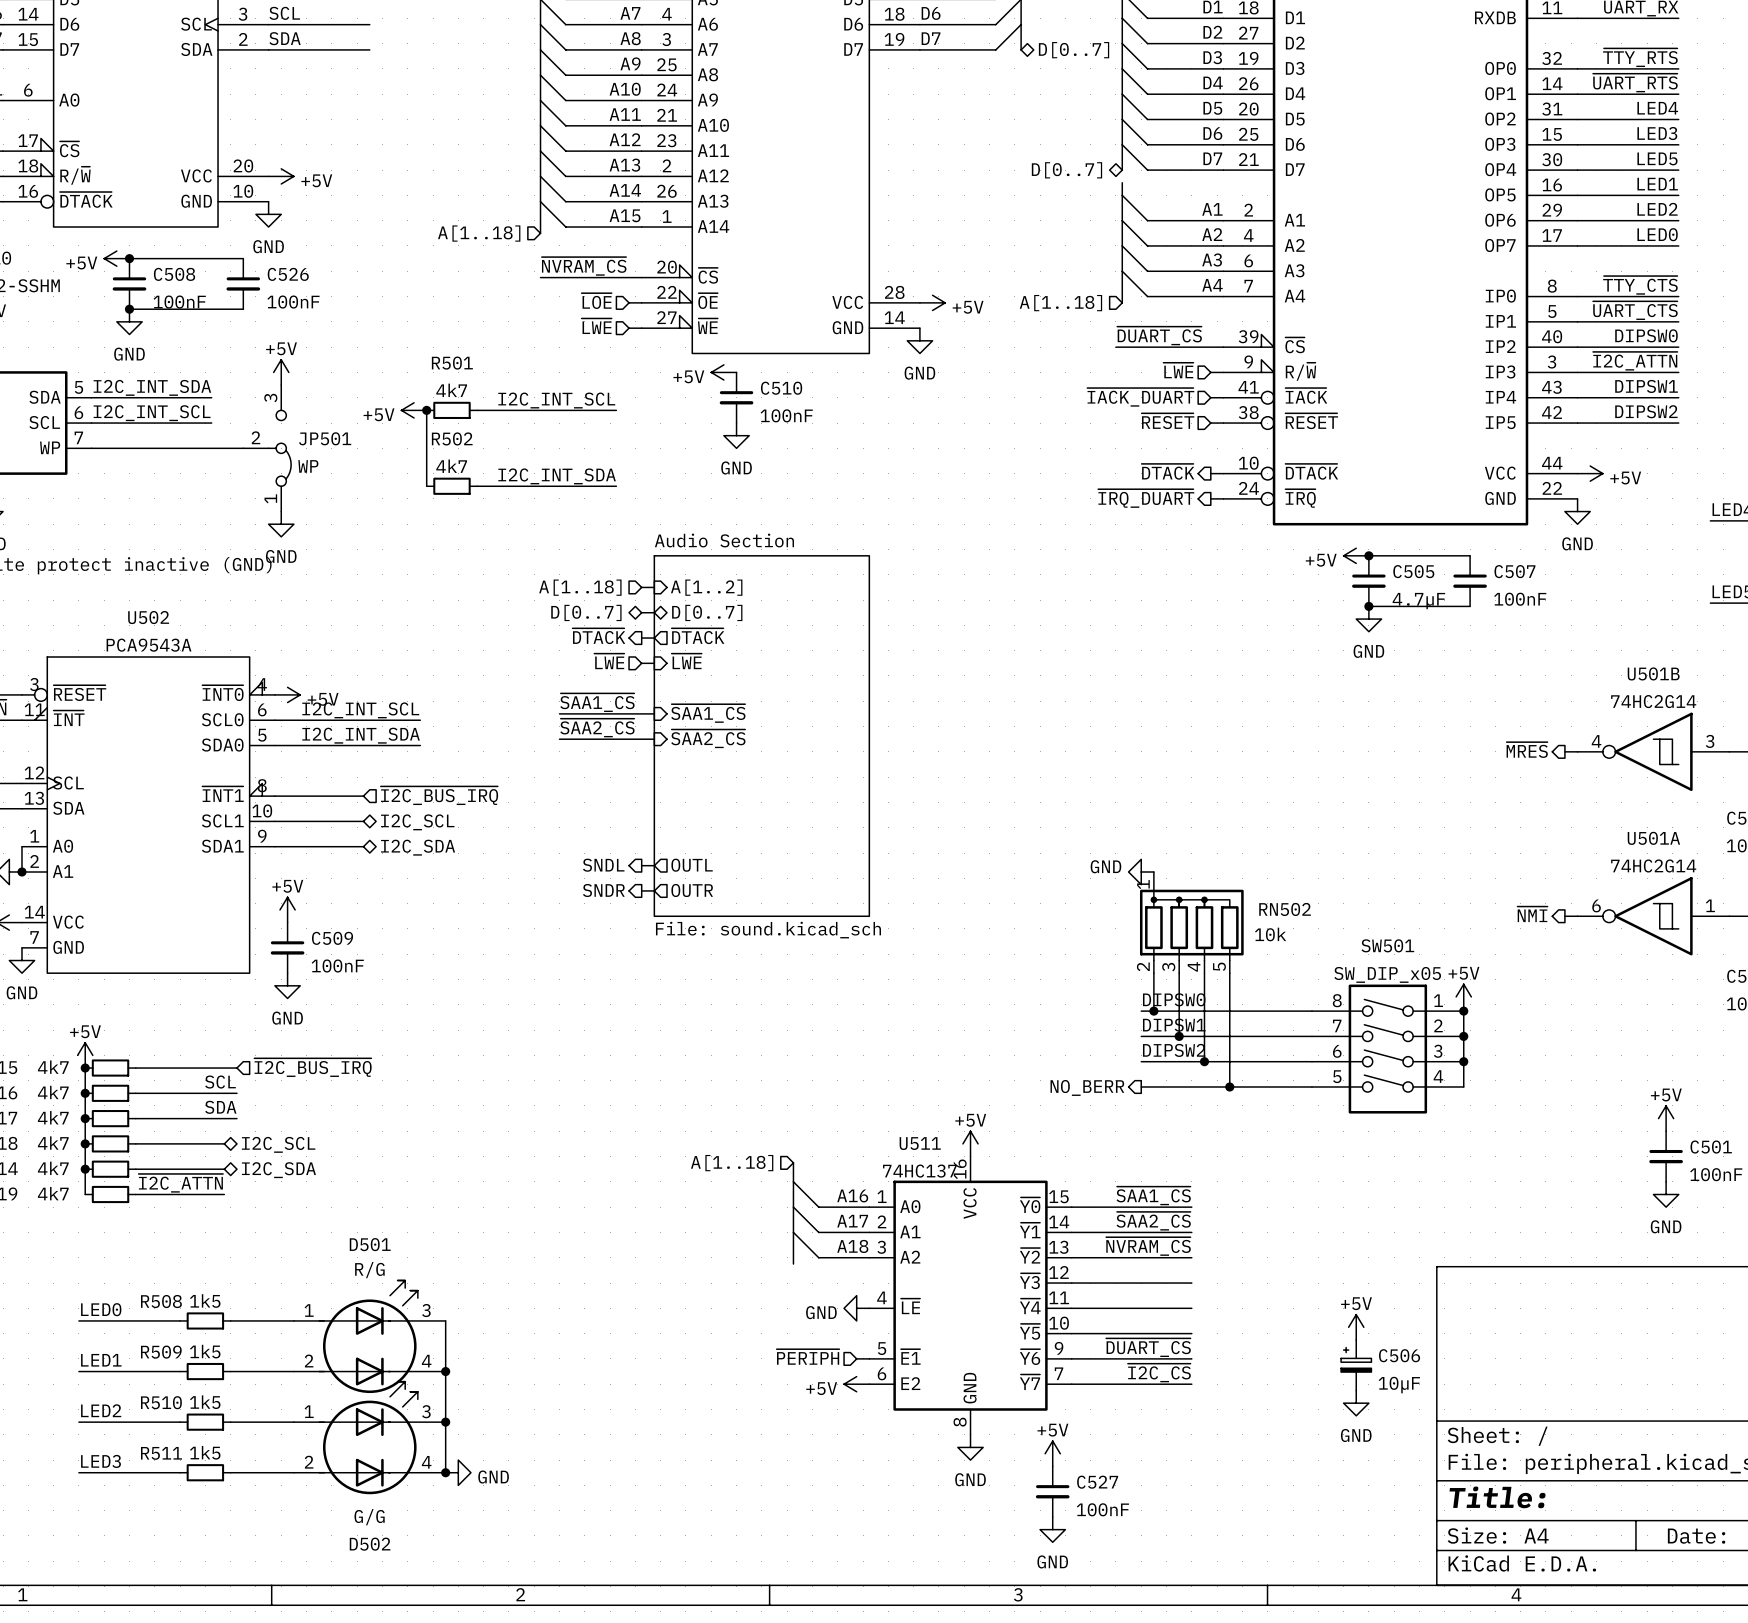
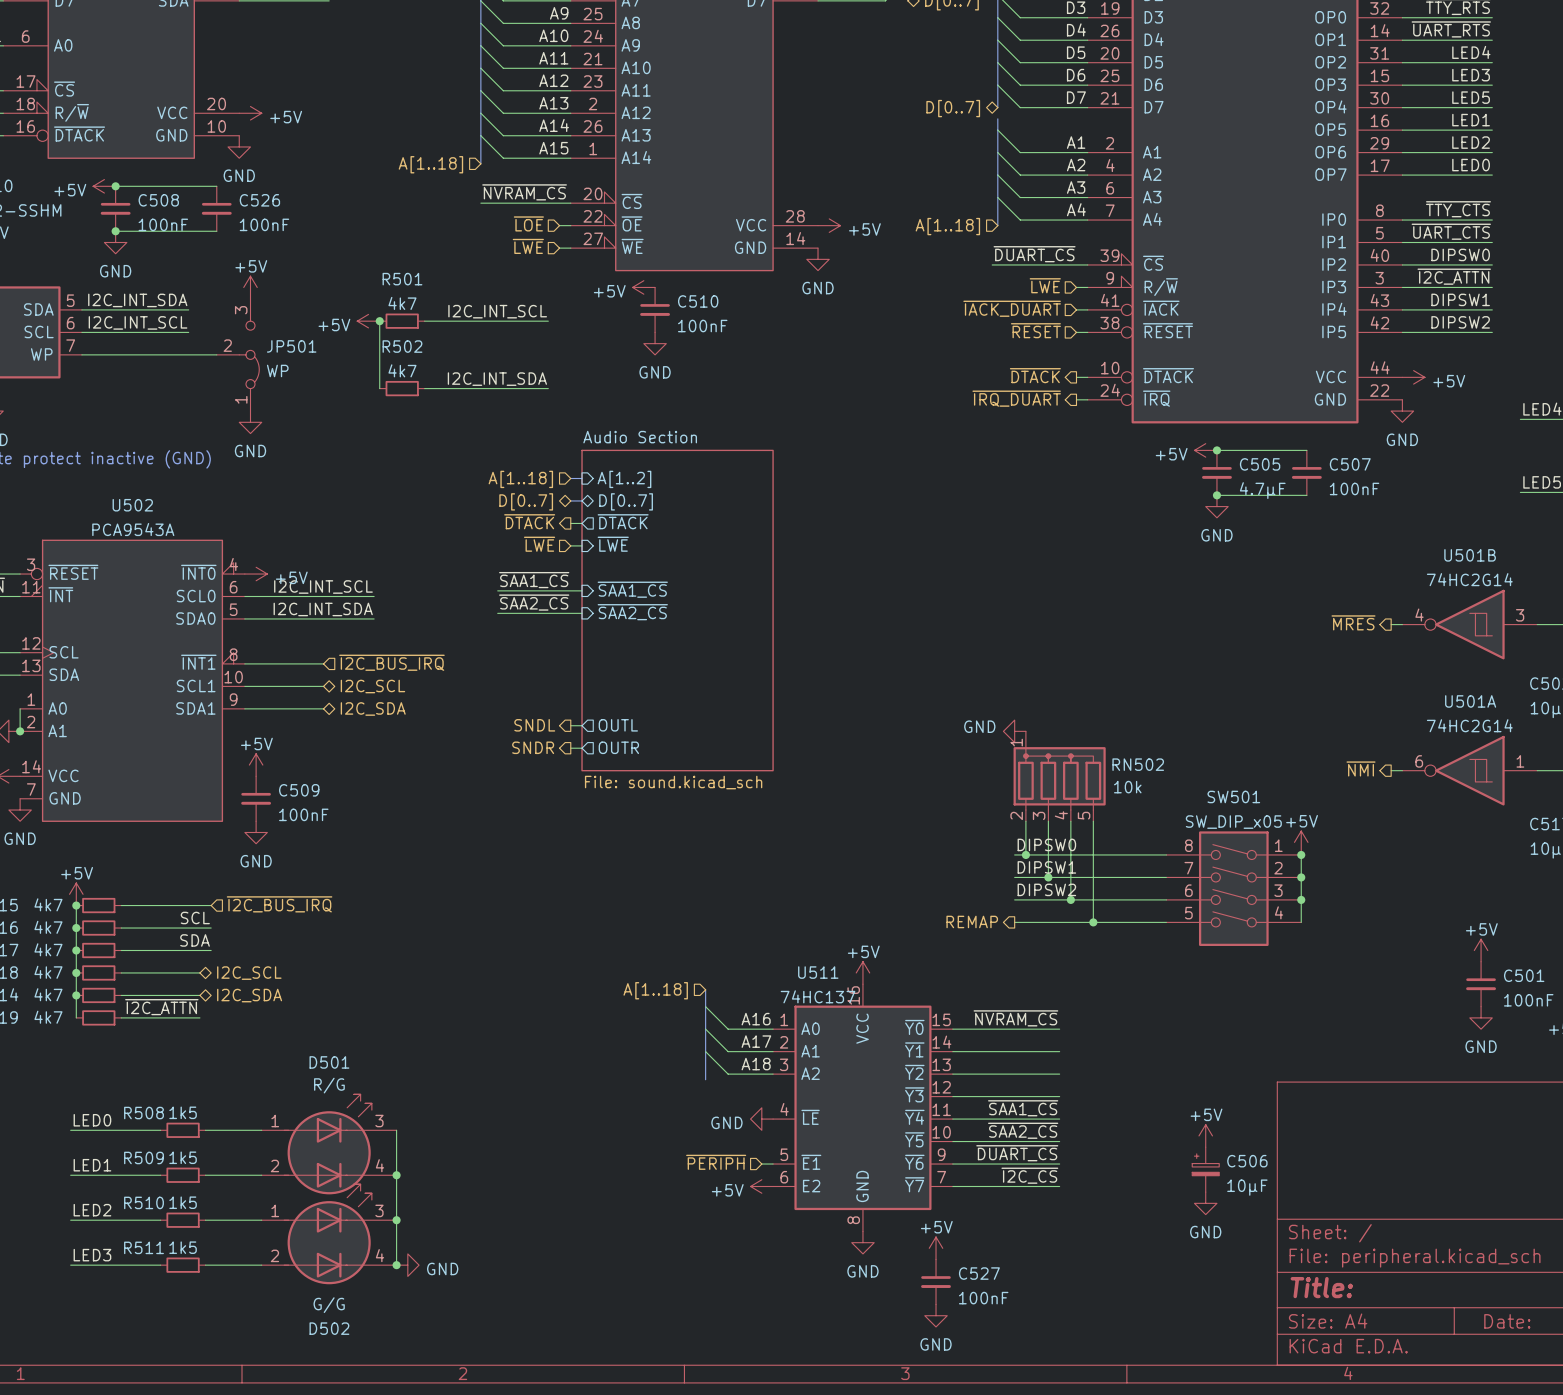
hierarchical label: NO_BERR (1087, 1087) -> REMAP (972, 921)
label: ~{SAA1_CS} (1153, 1195) -> ~{NVRAM_CS} (1015, 1018)
label position: ~{SAA2_CS} (1153, 1221) -> ~{SAA2_CS} (1023, 1130)
label: ~{NVRAM_CS} (1148, 1246) -> none
label: none -> ~{SAA1_CS} (1023, 1108)

